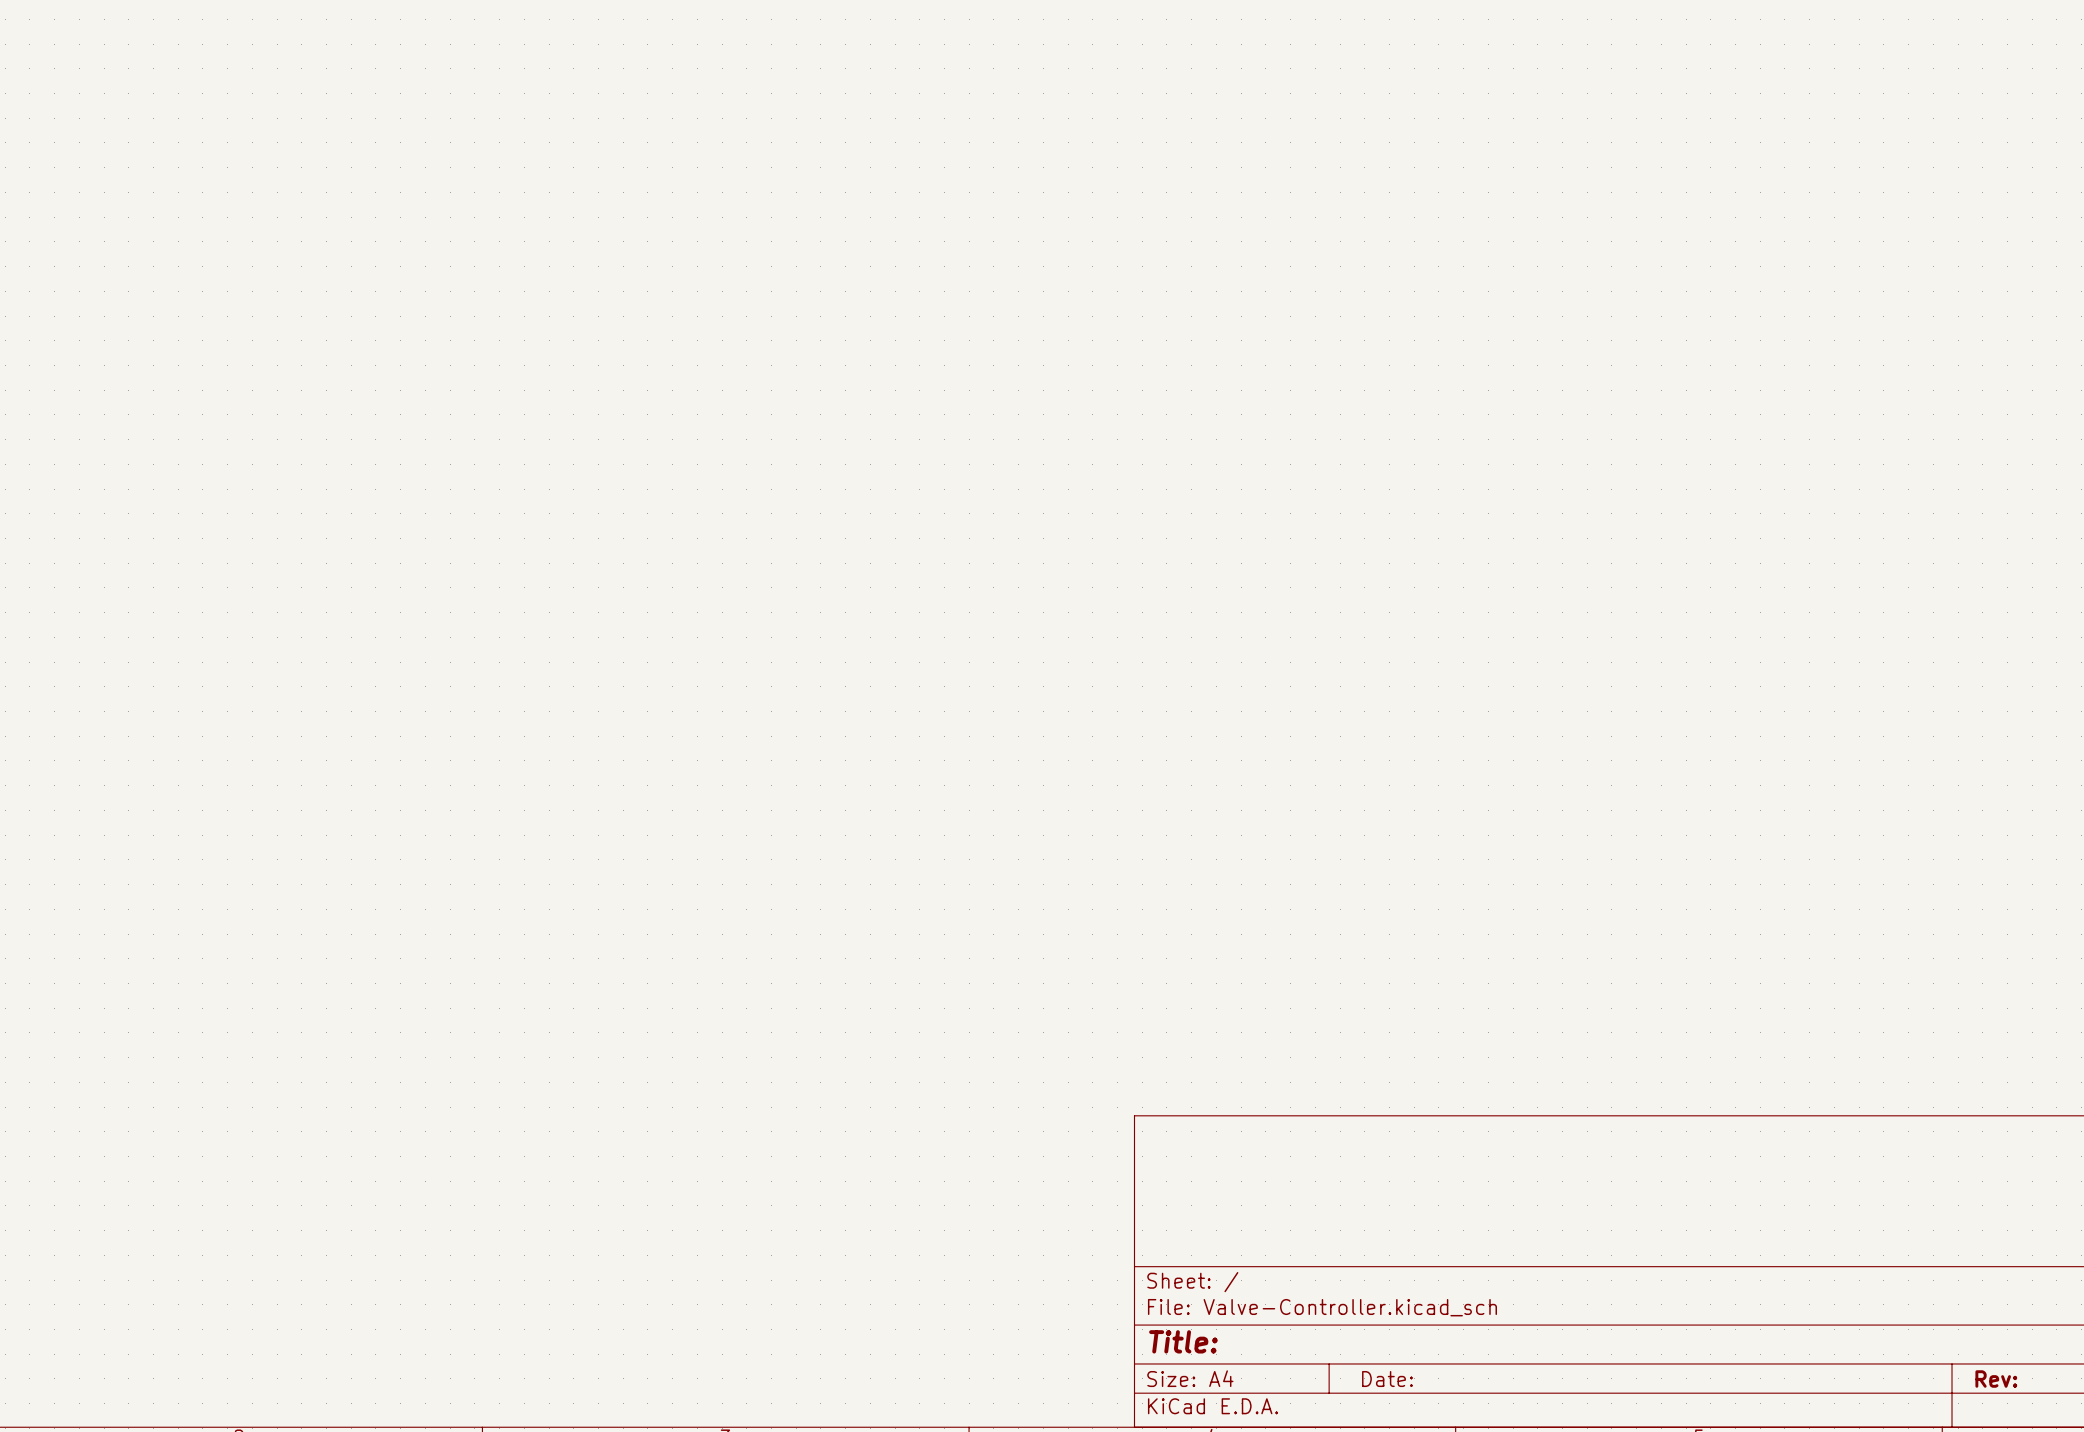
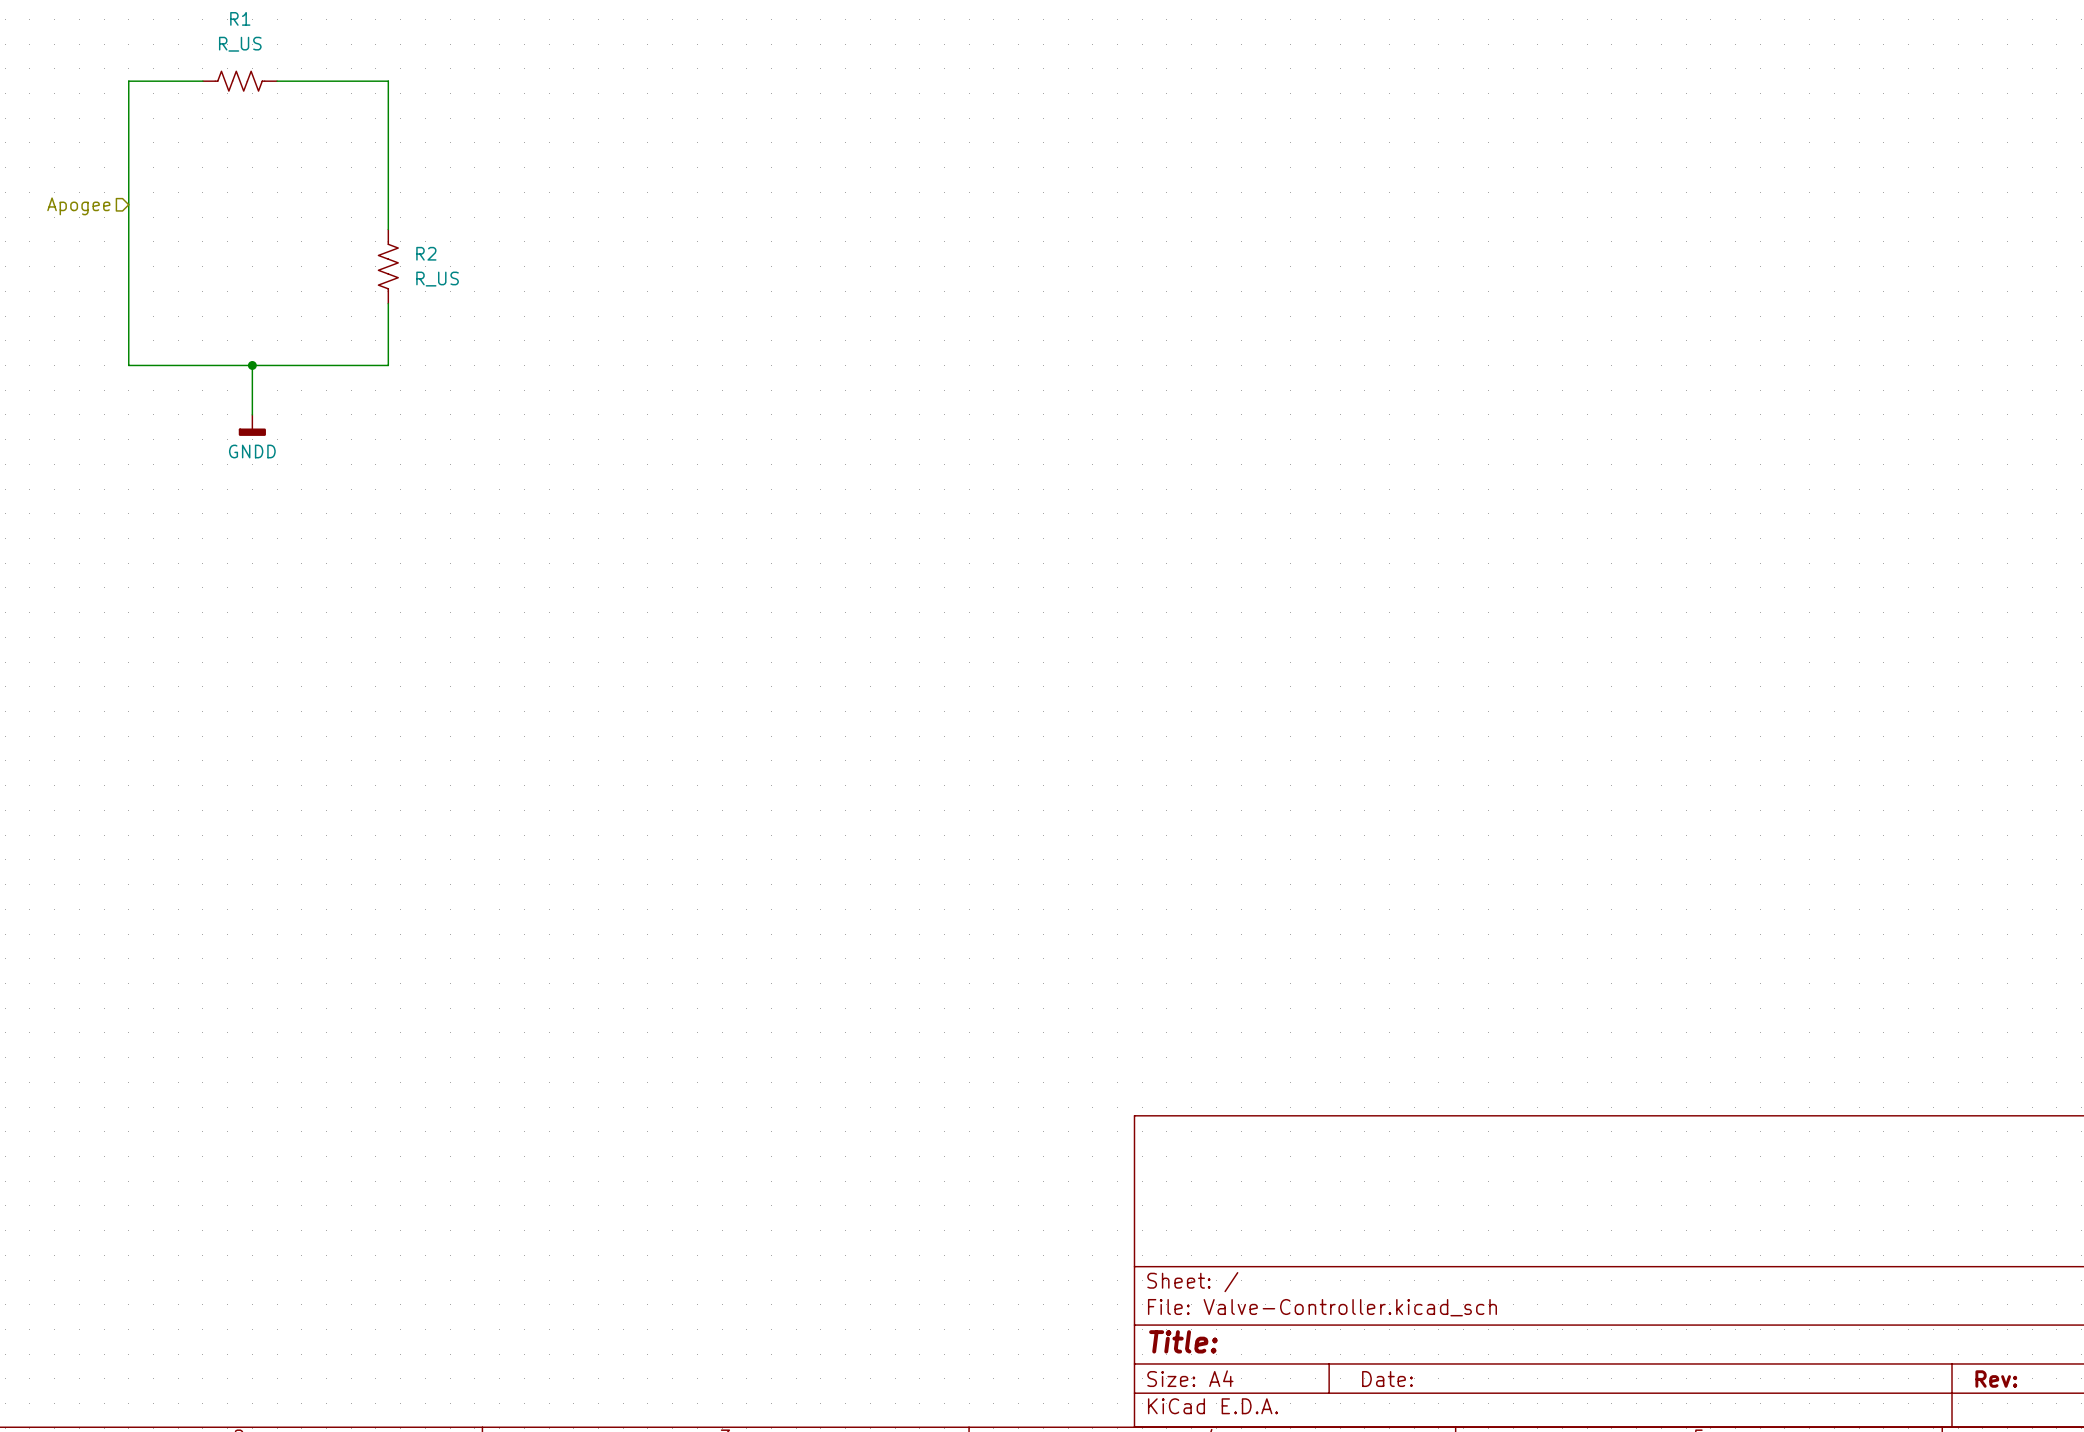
wire: none -> (202, 81) (128, 81) (128, 365) (388, 365) (388, 303)
R1: none -> R_US (240, 81)
wire: none -> (277, 81) (388, 81) (388, 229)
hierarchical label: none -> Apogee (78, 206)
R2: none -> R_US (388, 266)
wire: none -> (252, 365) (252, 414)
junction: none -> (252, 365)
power symbol: none -> GNDD (252, 425)

